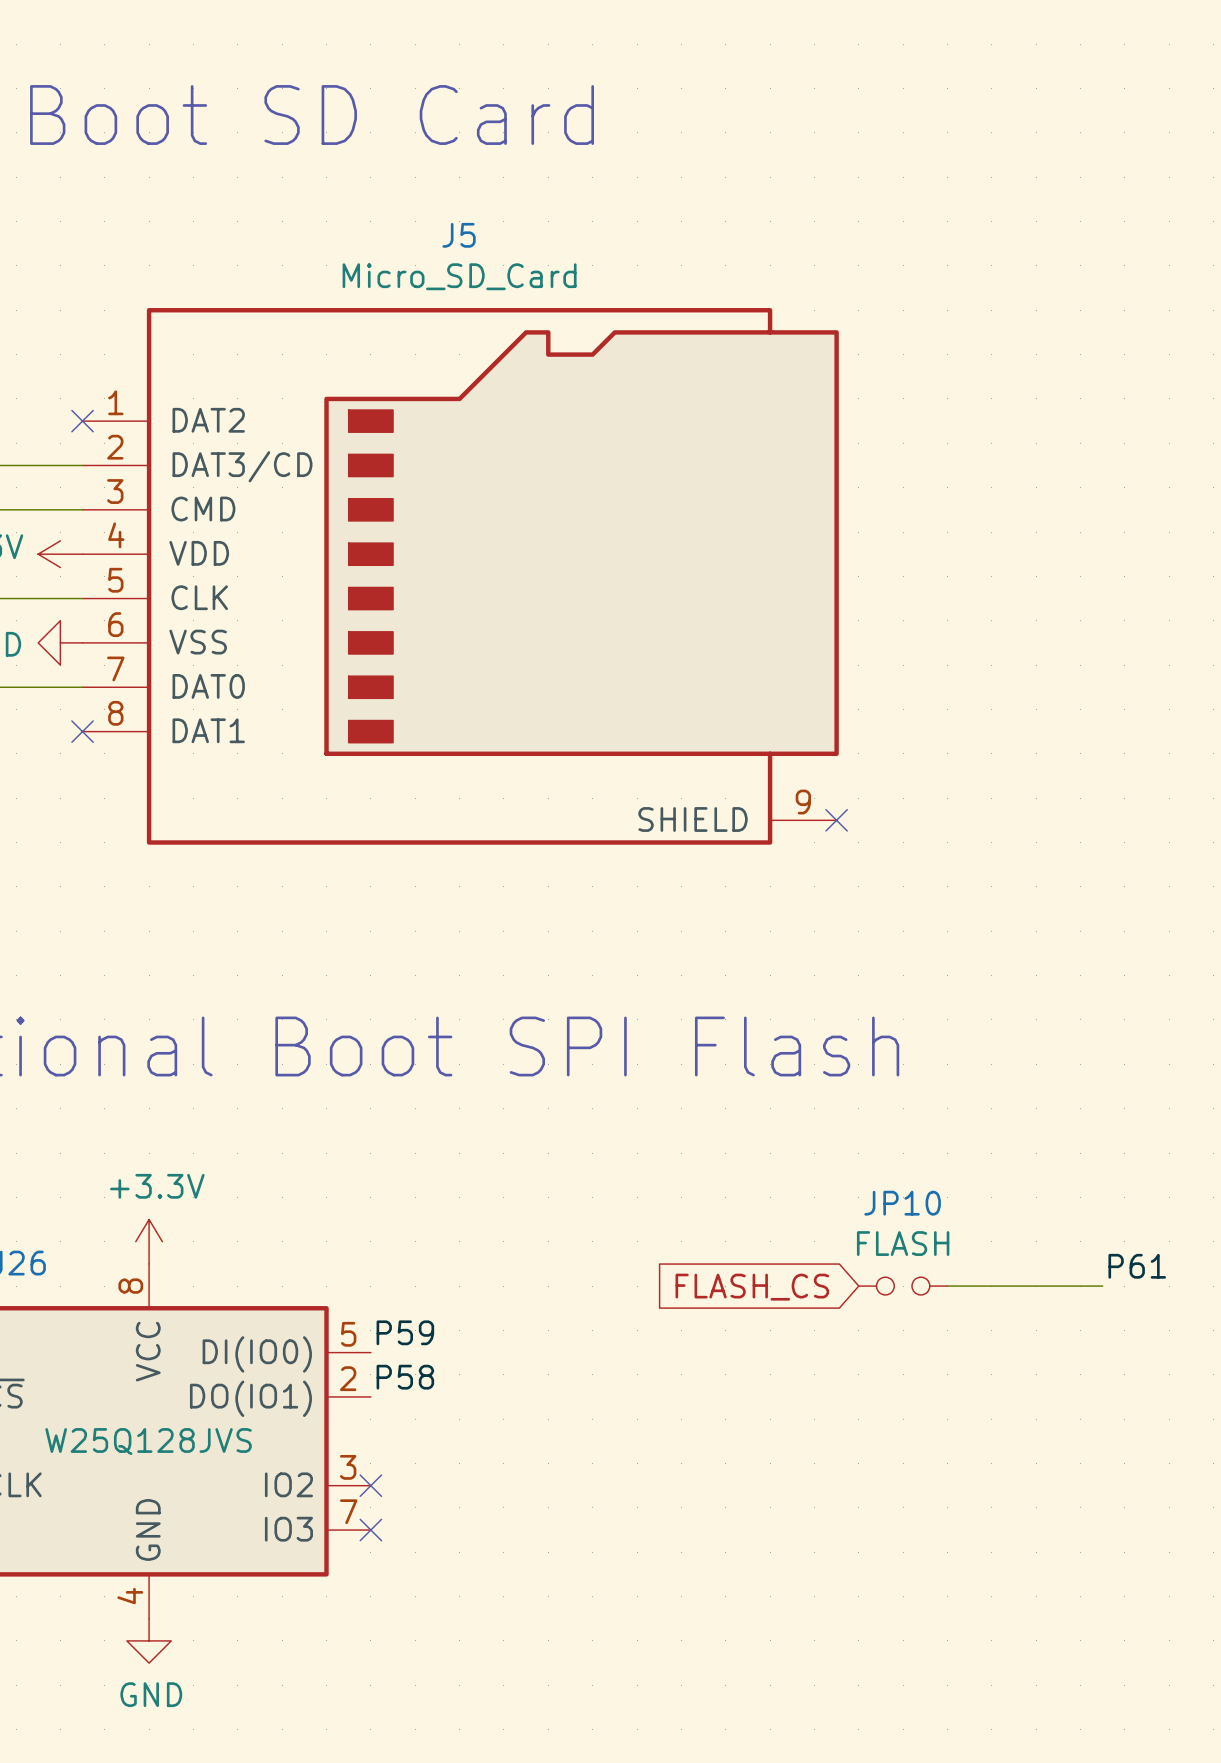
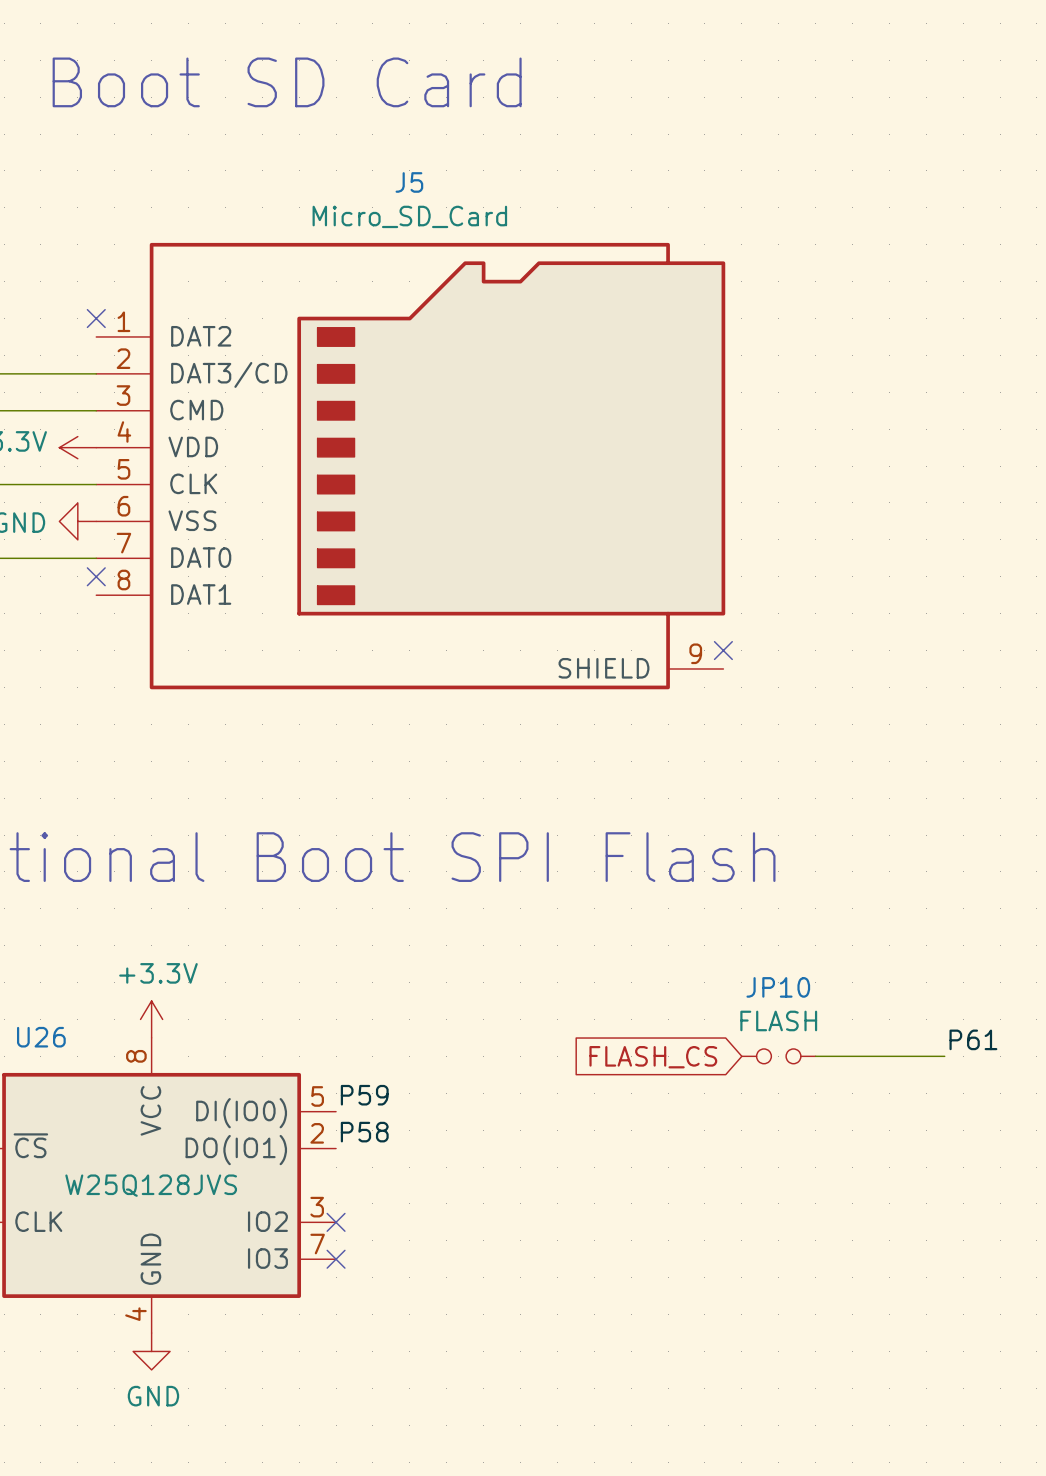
no-connect mark position: (82, 421) -> (96, 318)
no-connect mark position: (82, 731) -> (96, 576)
no-connect mark position: (836, 820) -> (723, 650)

